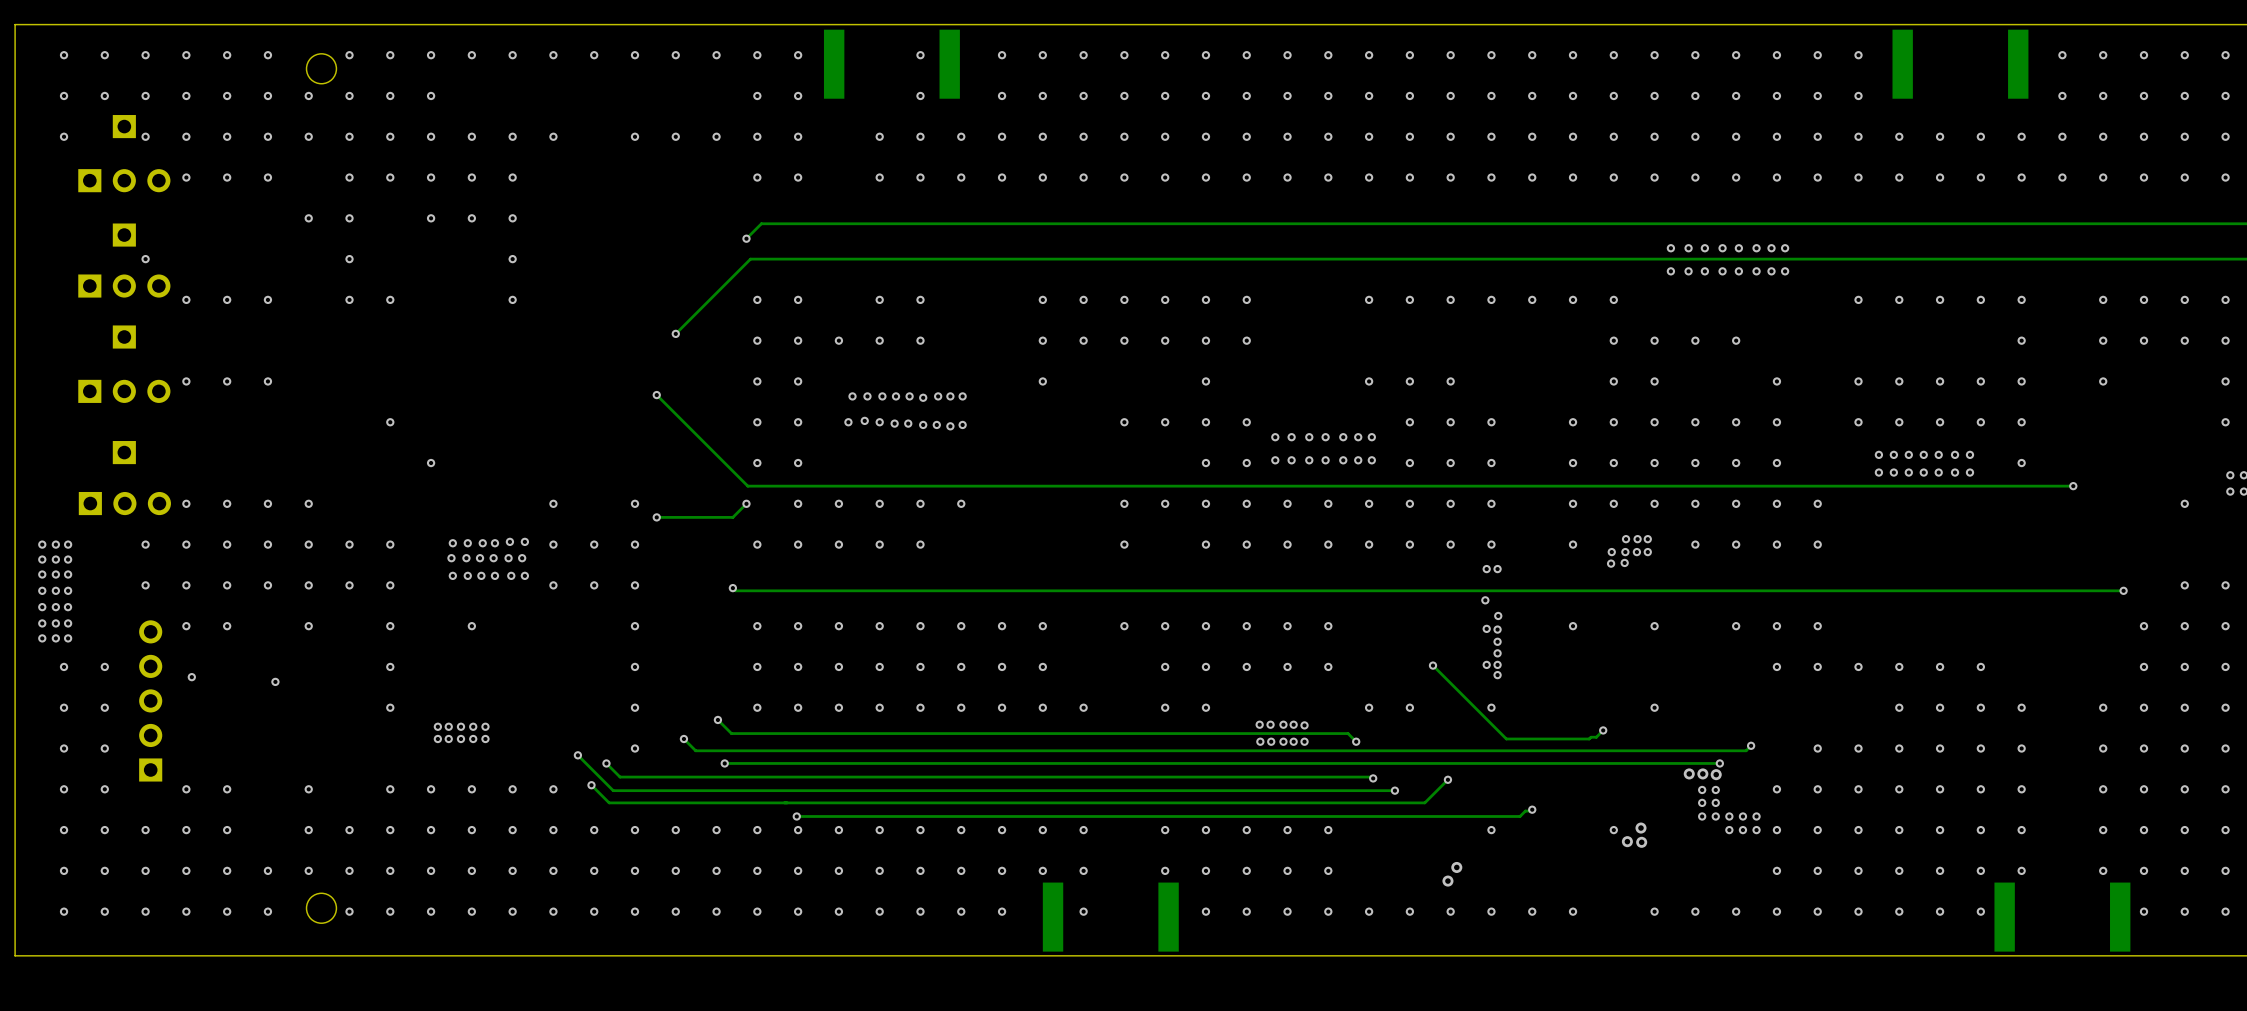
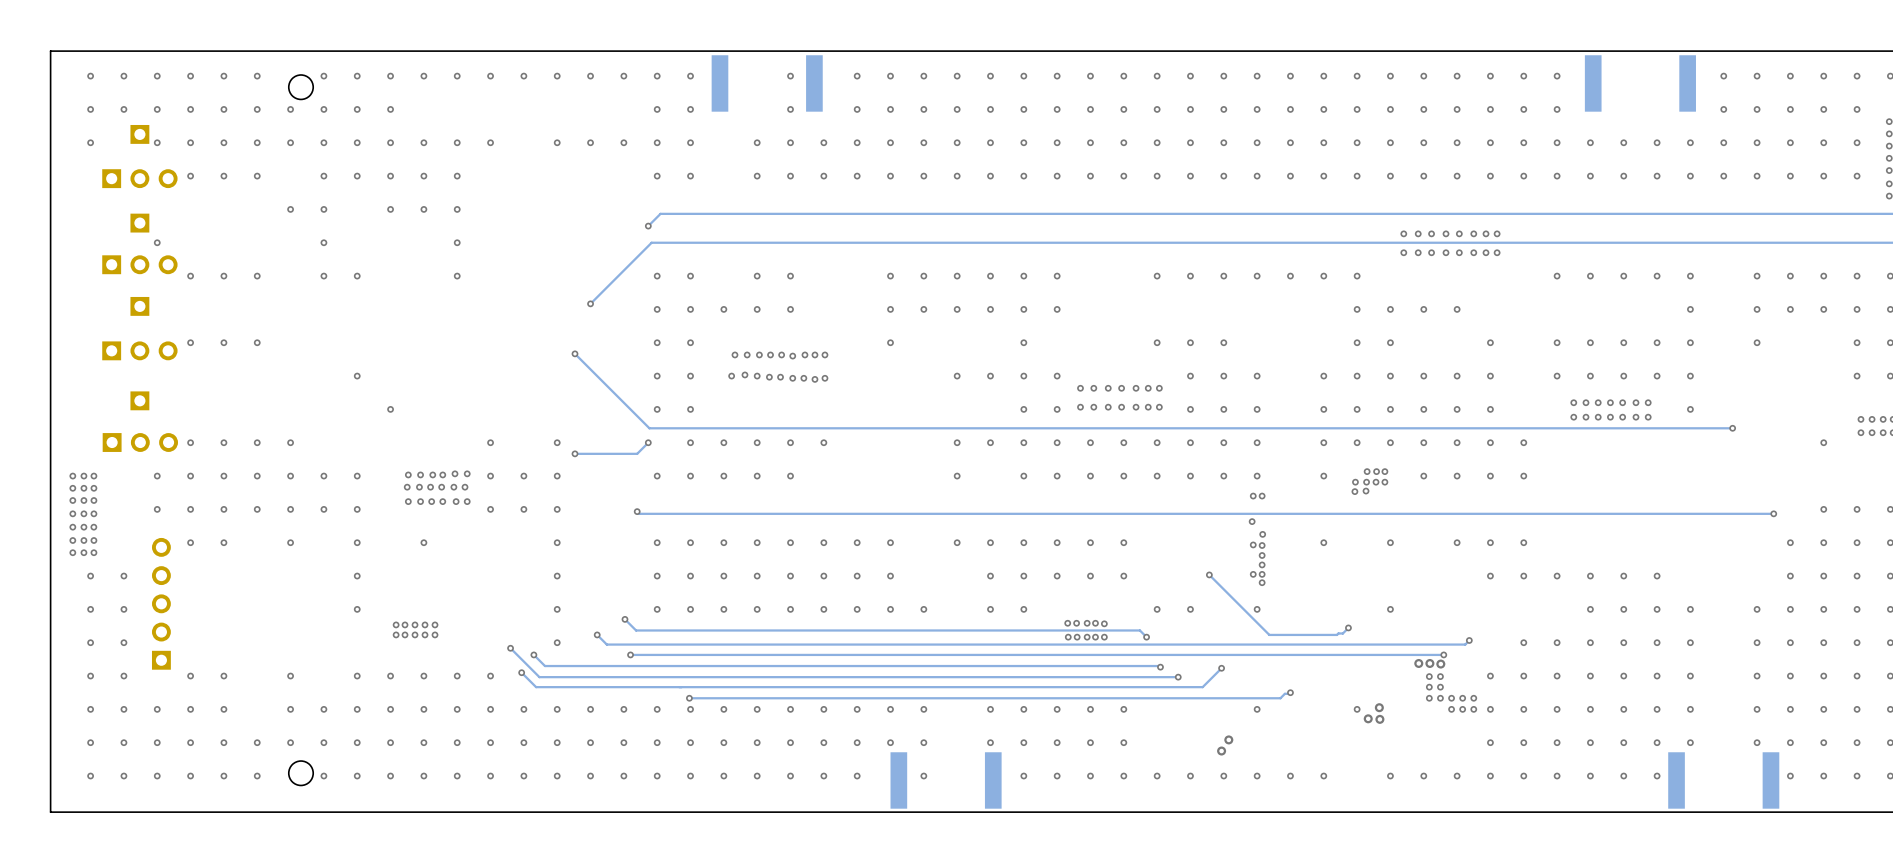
via: (191, 677) -> none
via: (275, 681) -> none

